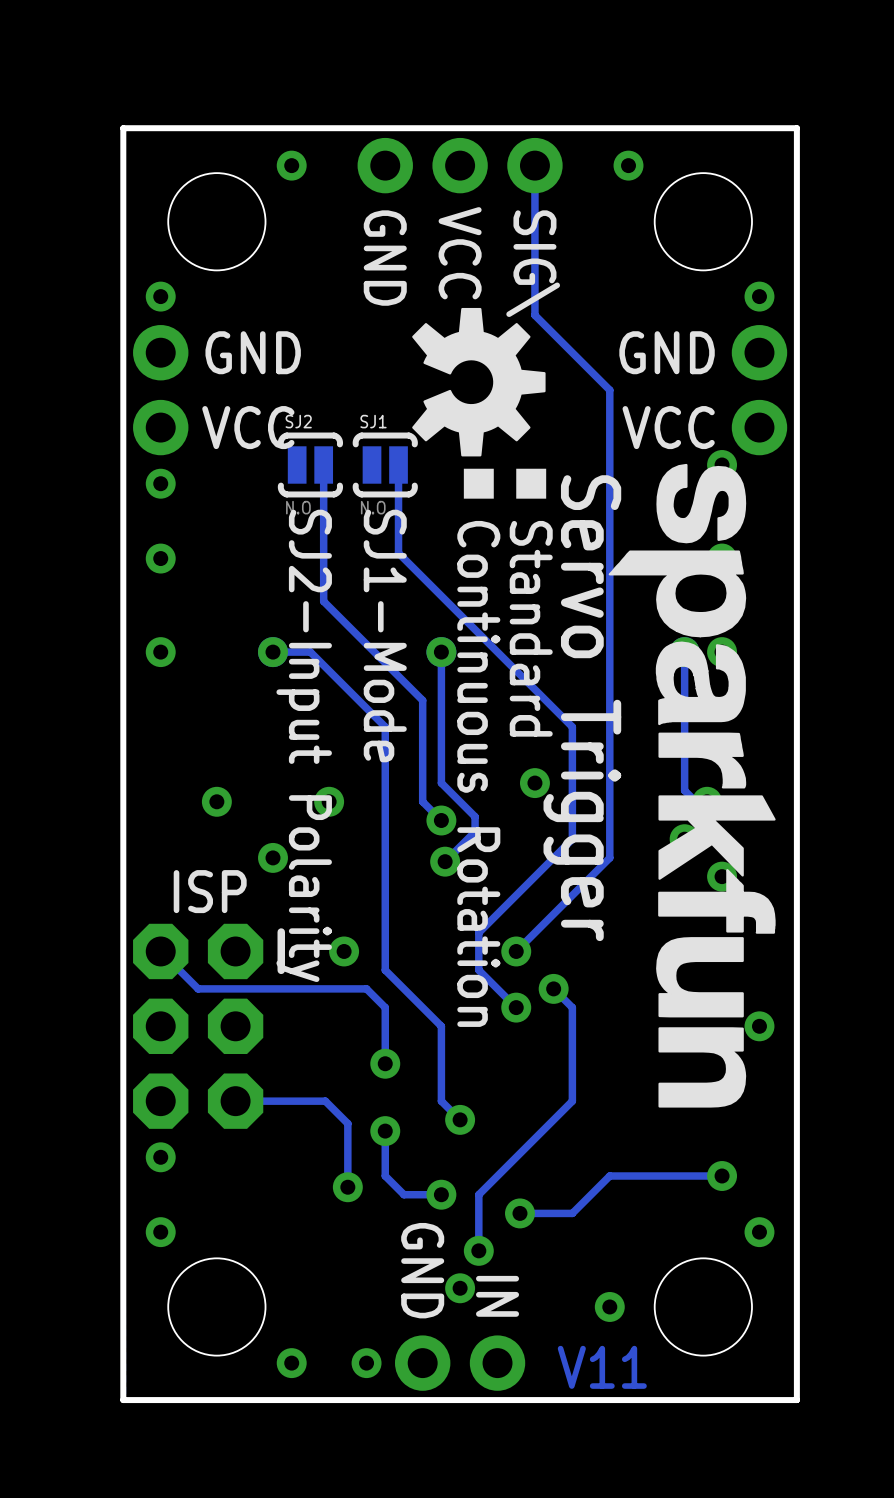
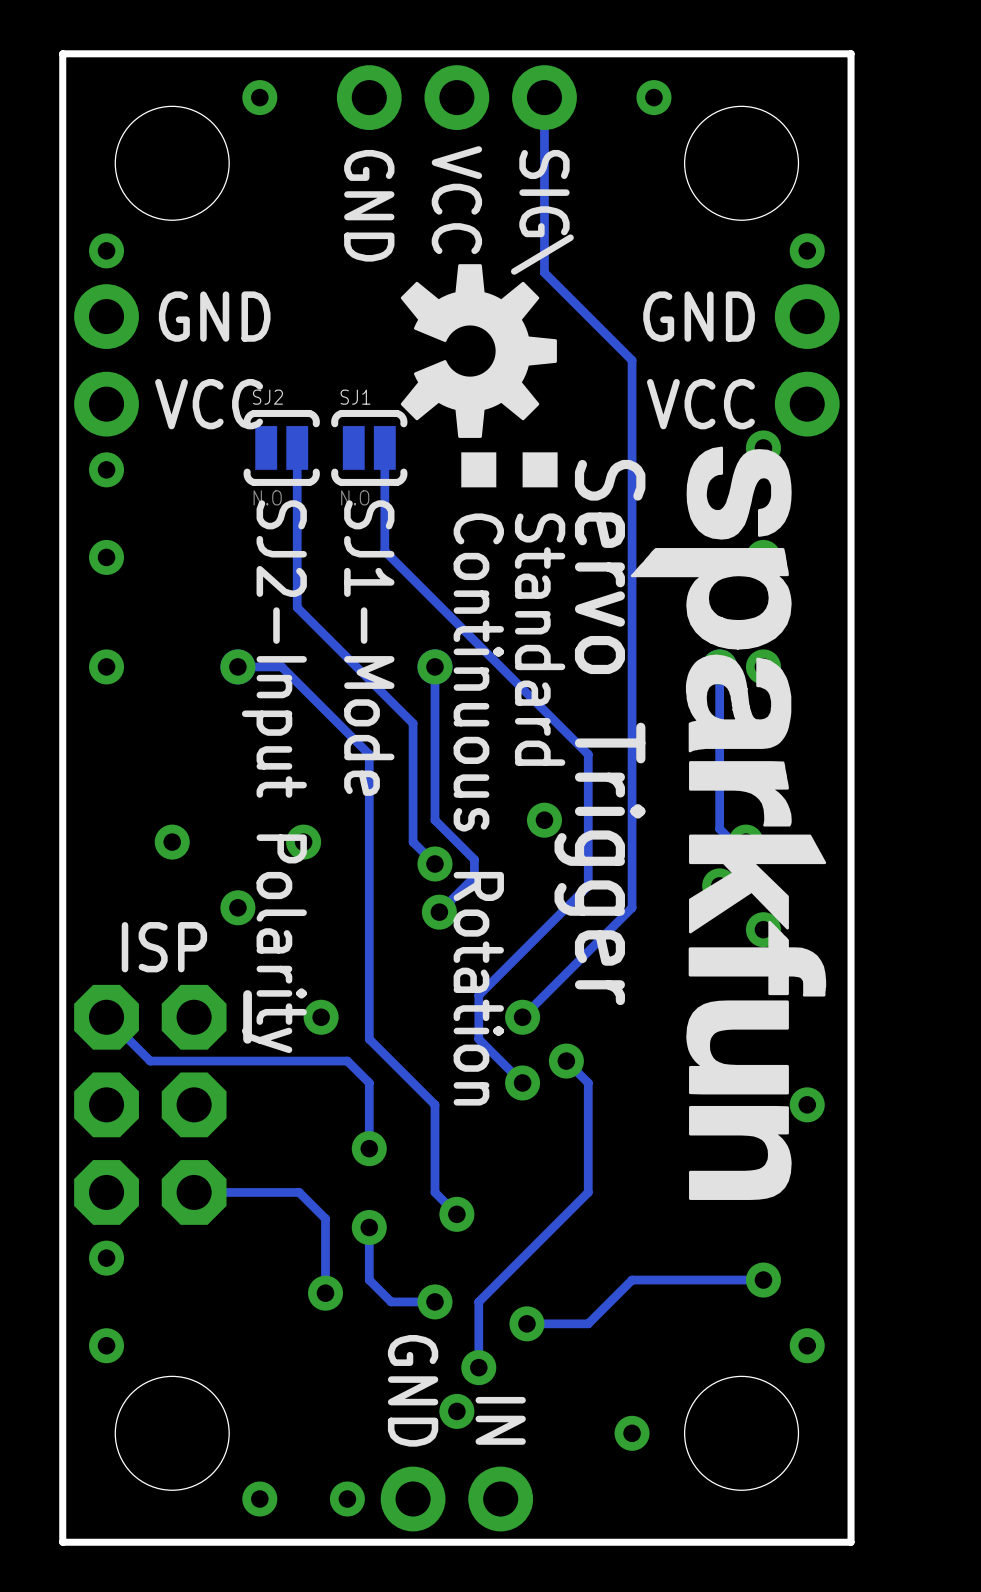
text: V11 (602, 1367) -> none

